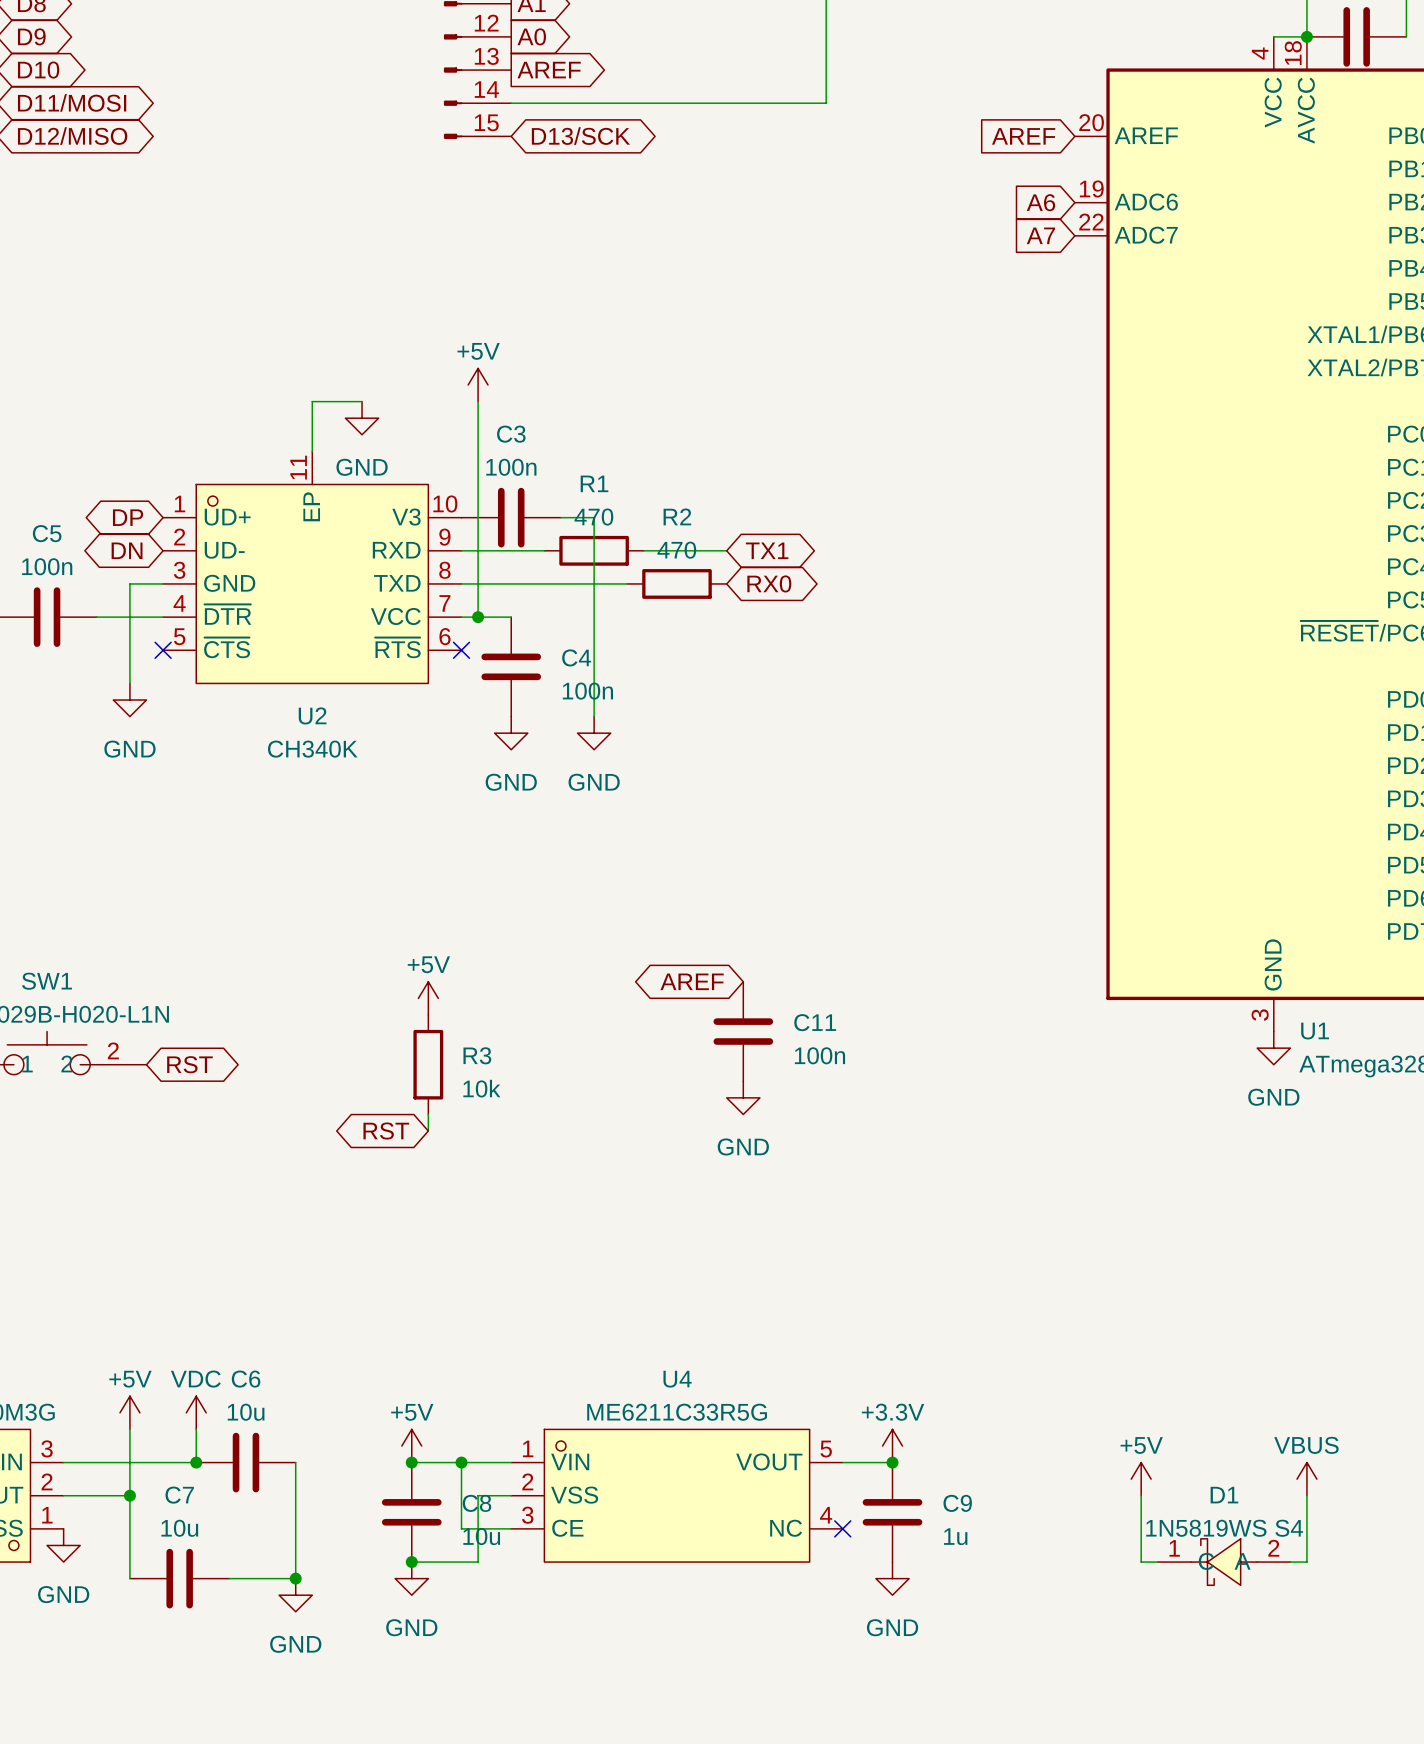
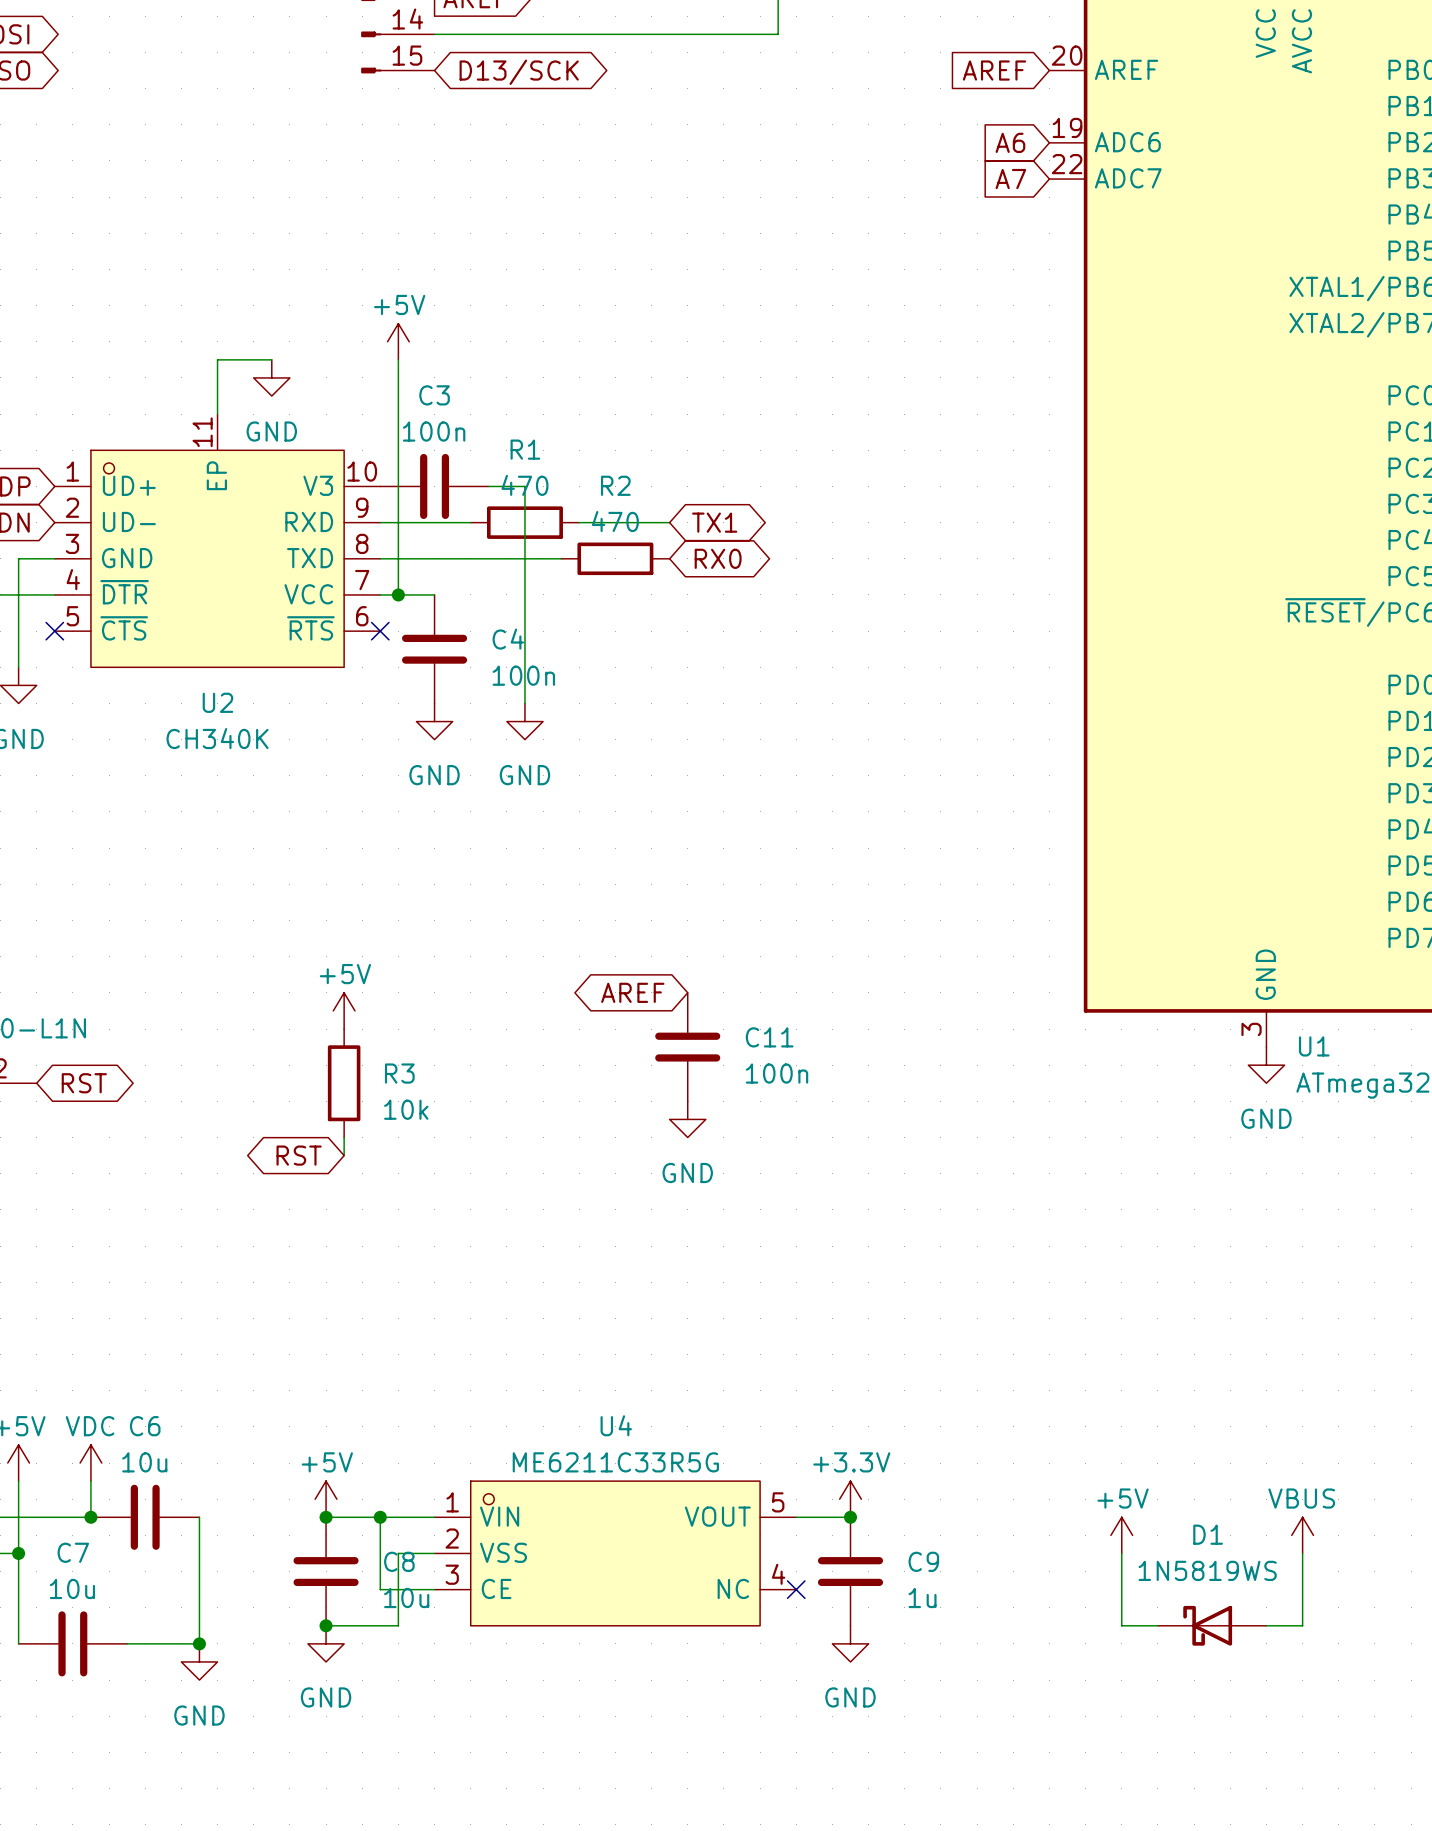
D1 value: 1N5819WS S4 (1224, 1528) -> 1N5819WS (1207, 1570)
D1 symbol: [1157, 1538, 1291, 1586] -> [1157, 1605, 1267, 1646]

